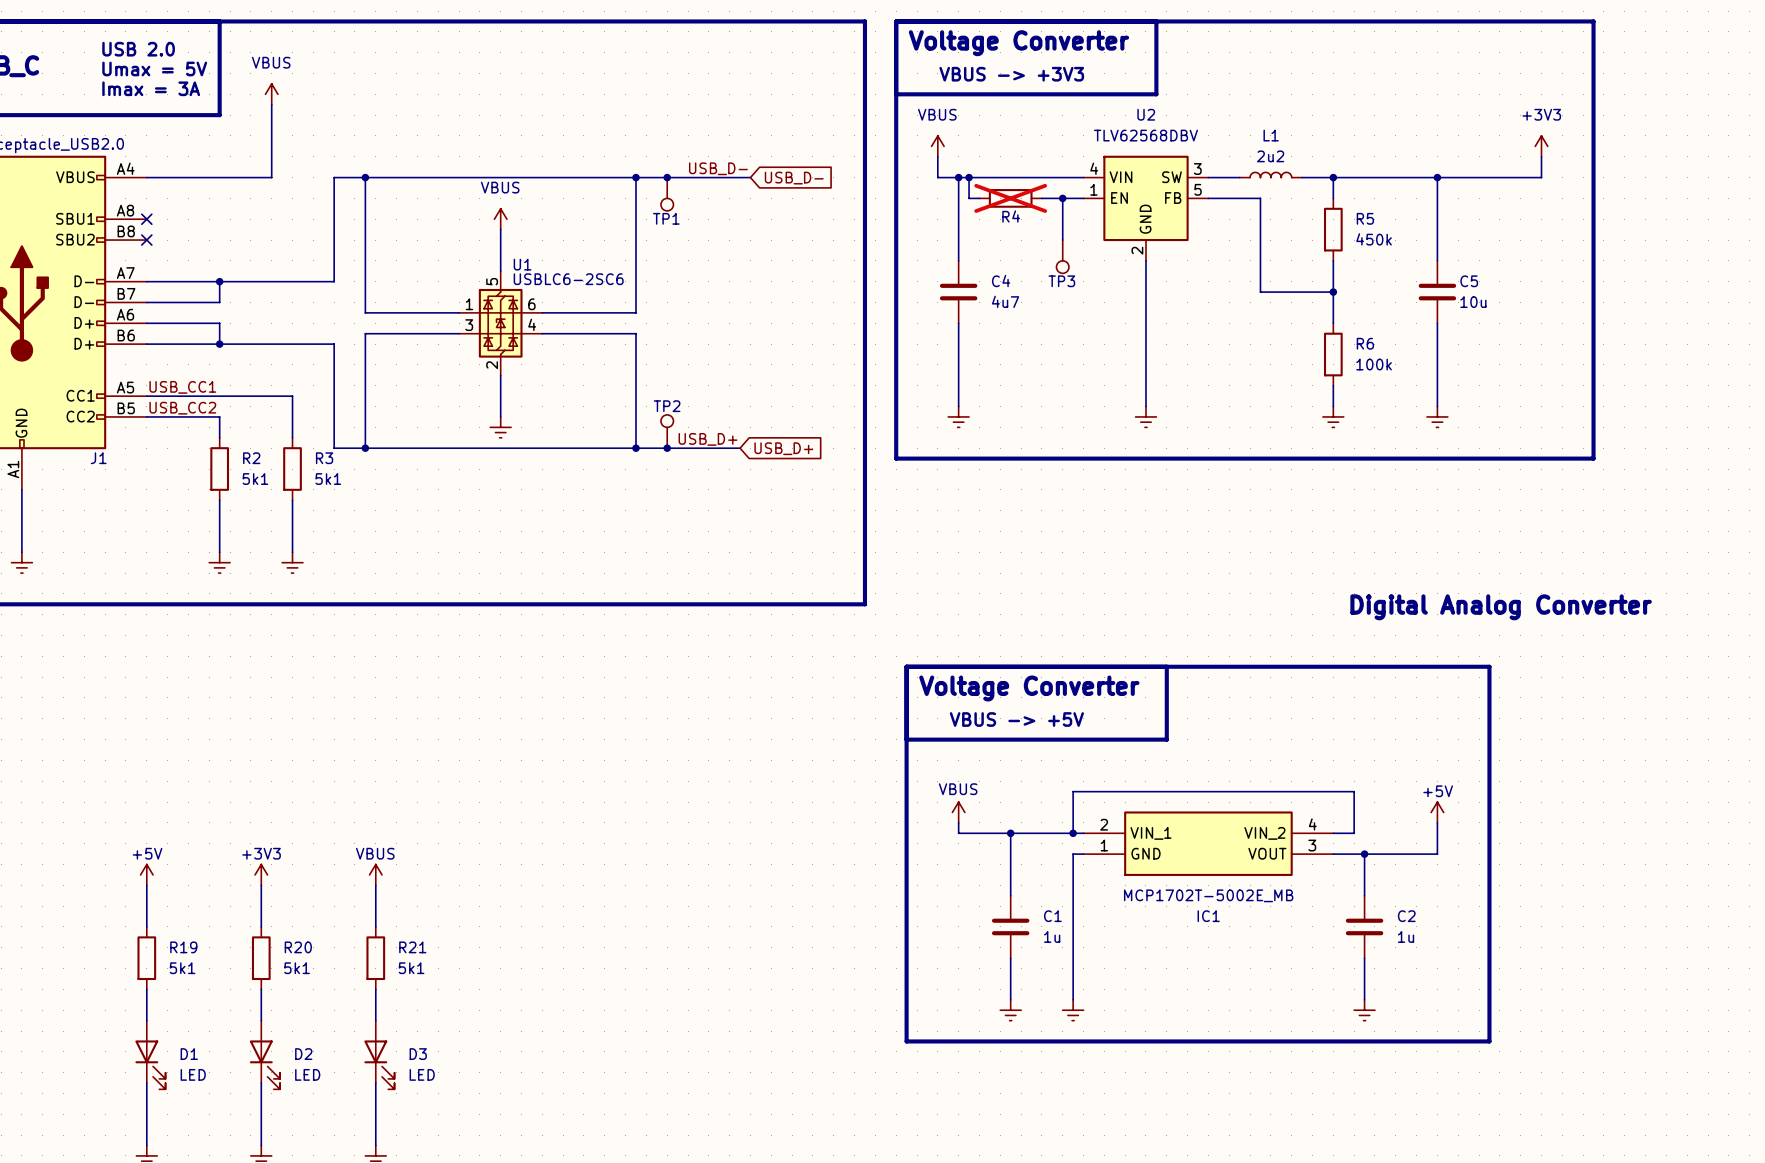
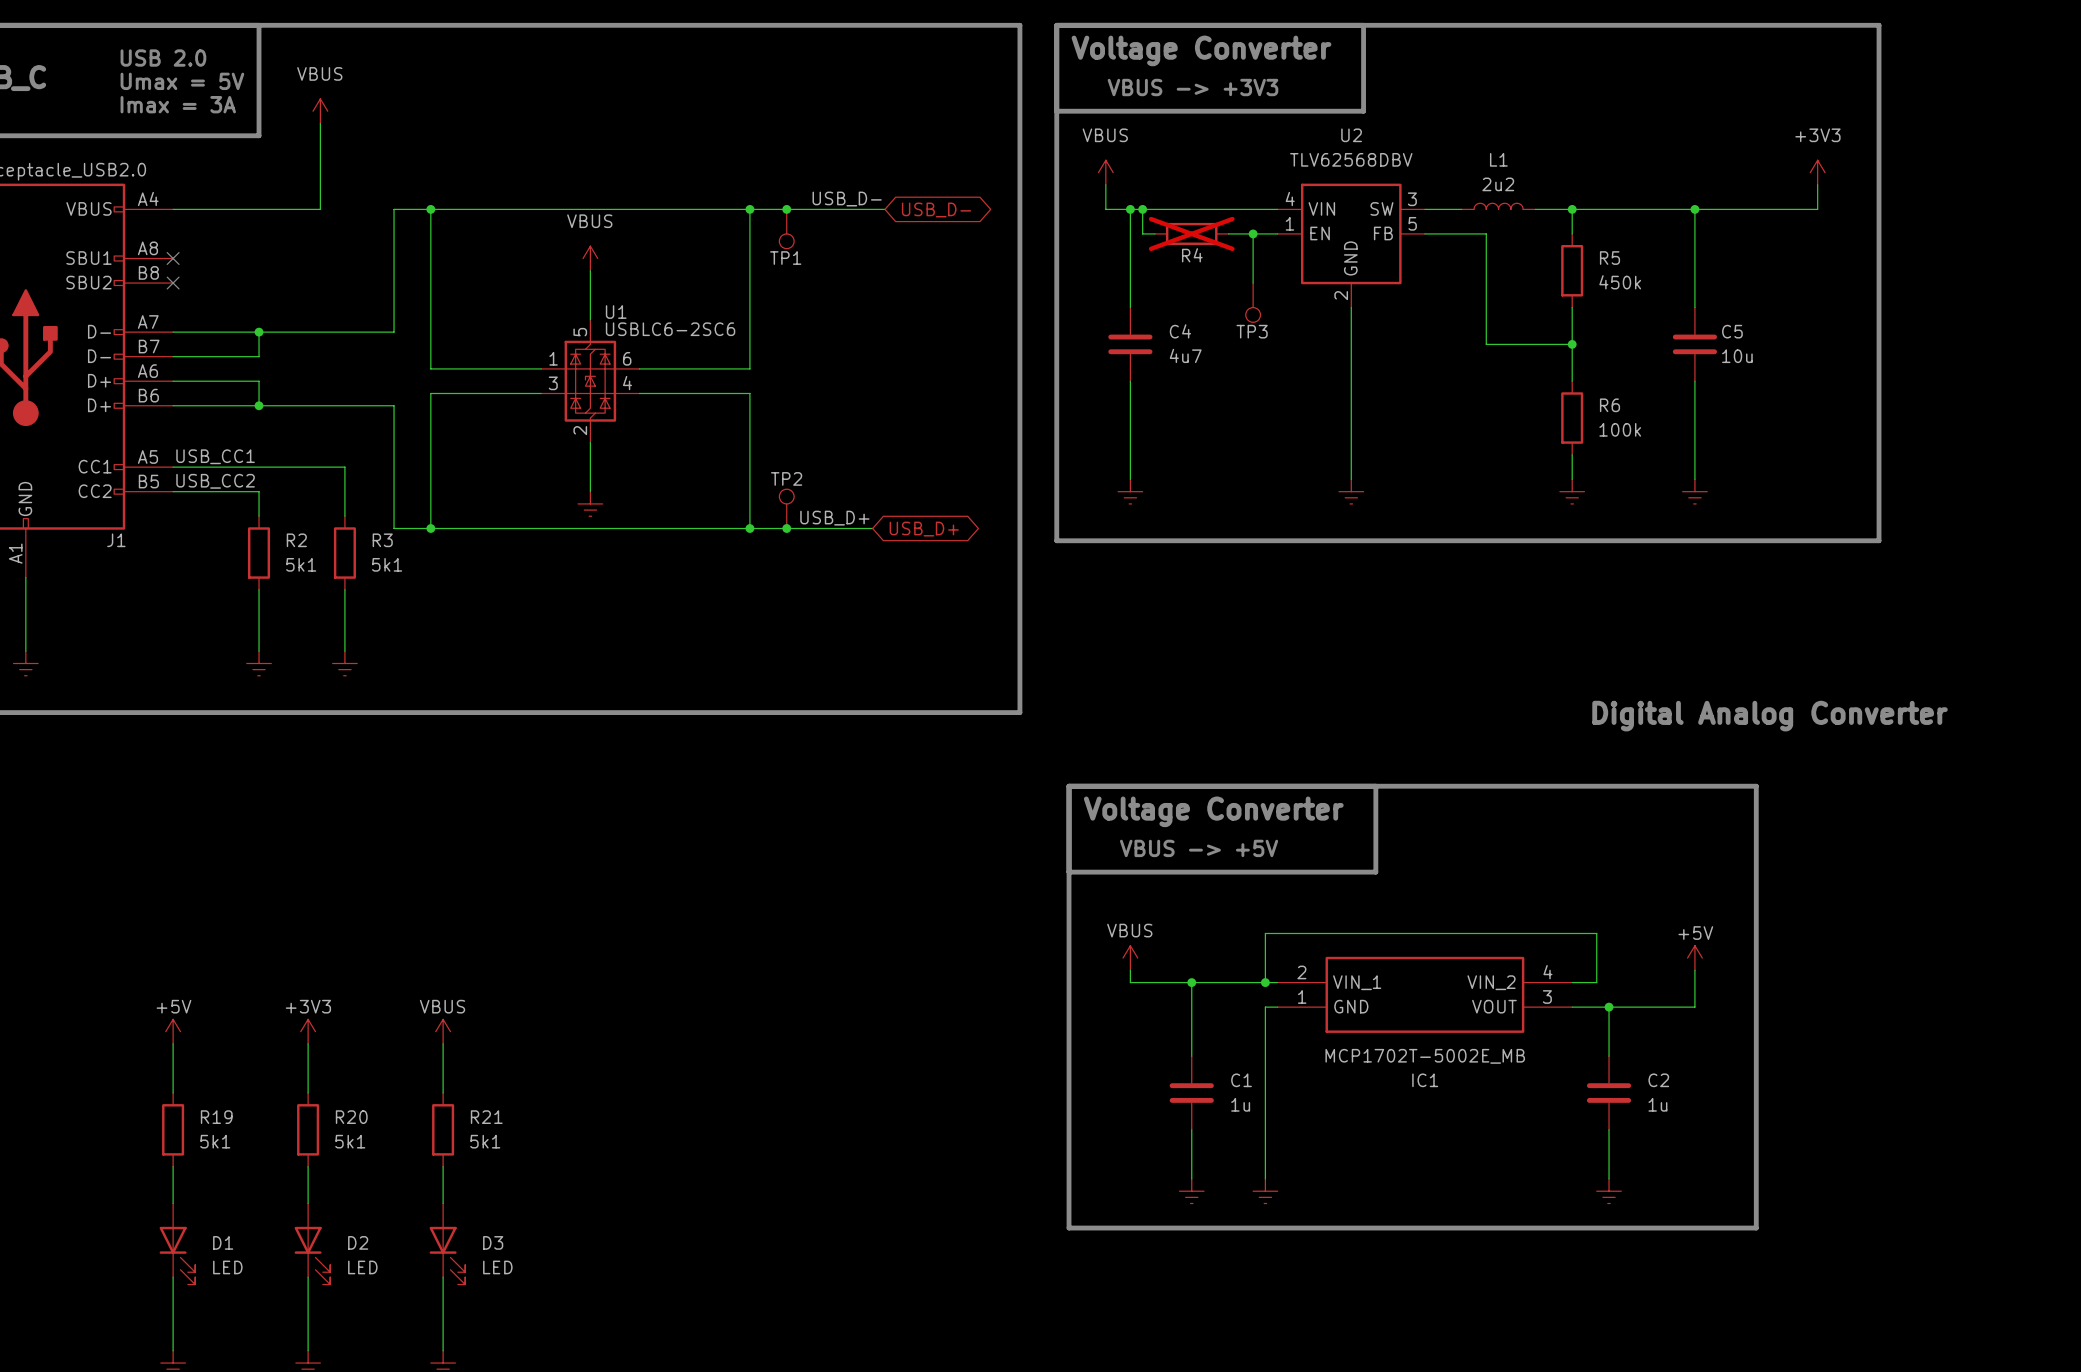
global label shape: input (794, 178) -> bidirectional (936, 209)
global label shape: input (783, 448) -> bidirectional (924, 529)

